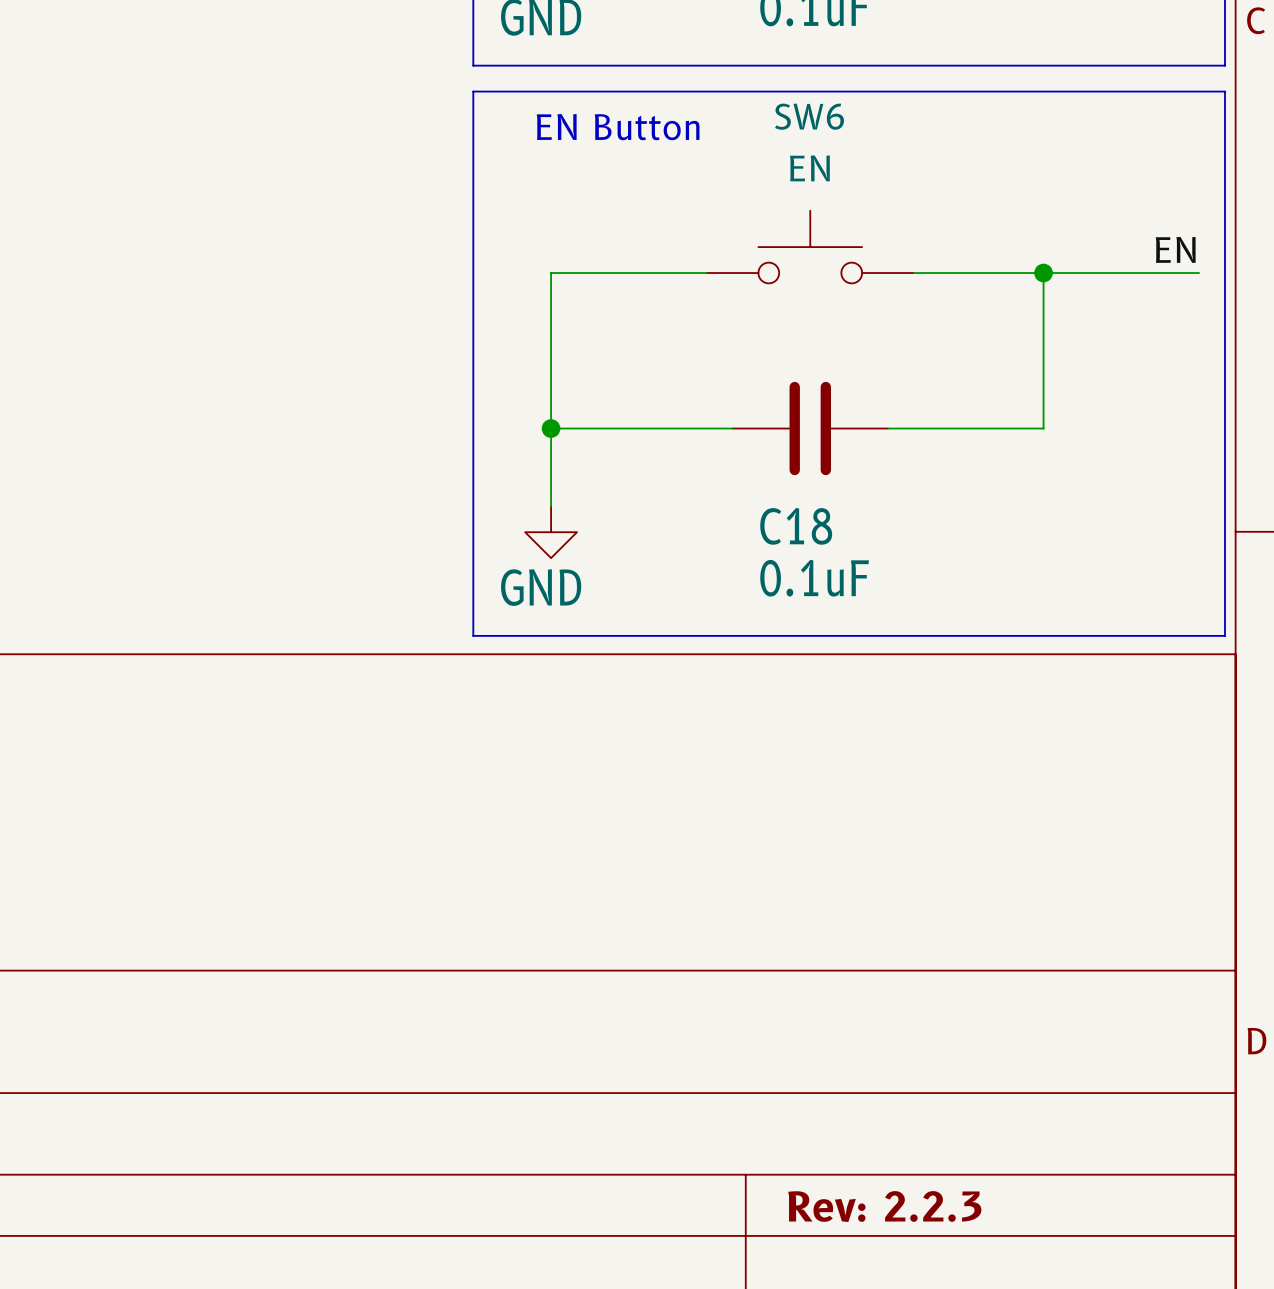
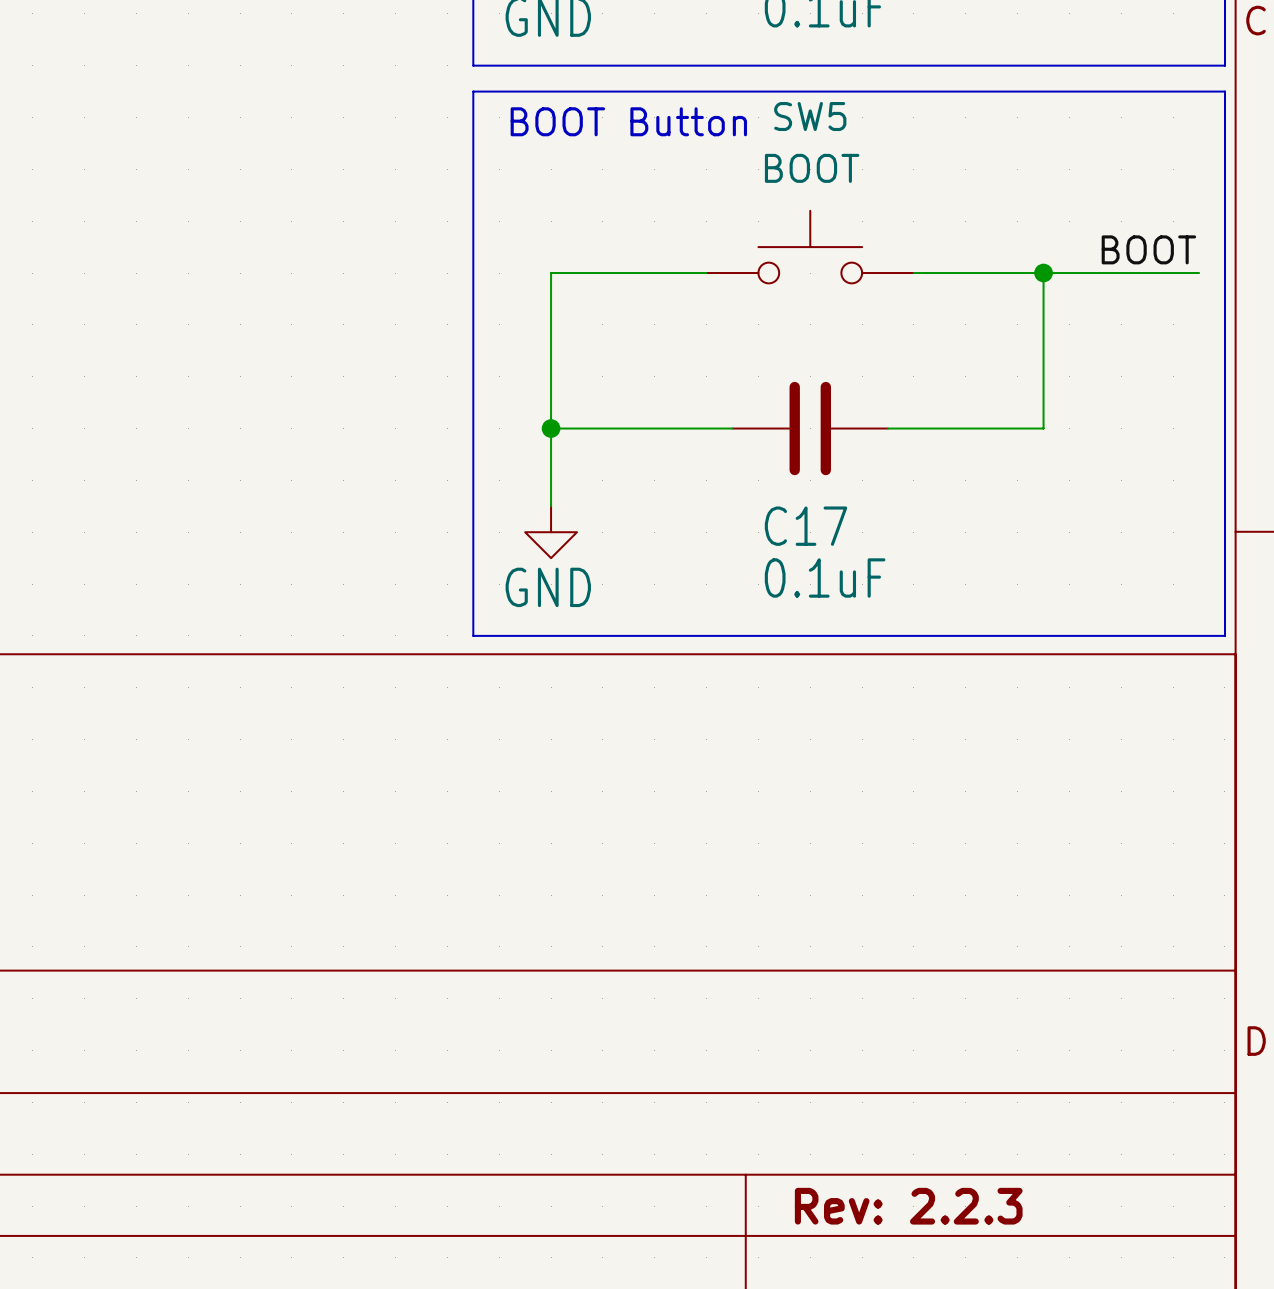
SW6 name: SW6 (809, 116) -> SW5 (810, 116)
text: EN Button (618, 127) -> BOOT Button (628, 121)
SW6 value: EN (809, 168) -> BOOT (812, 168)
label: EN (1175, 249) -> BOOT (1148, 249)
C18 name: C18 (796, 526) -> C17 (806, 526)

